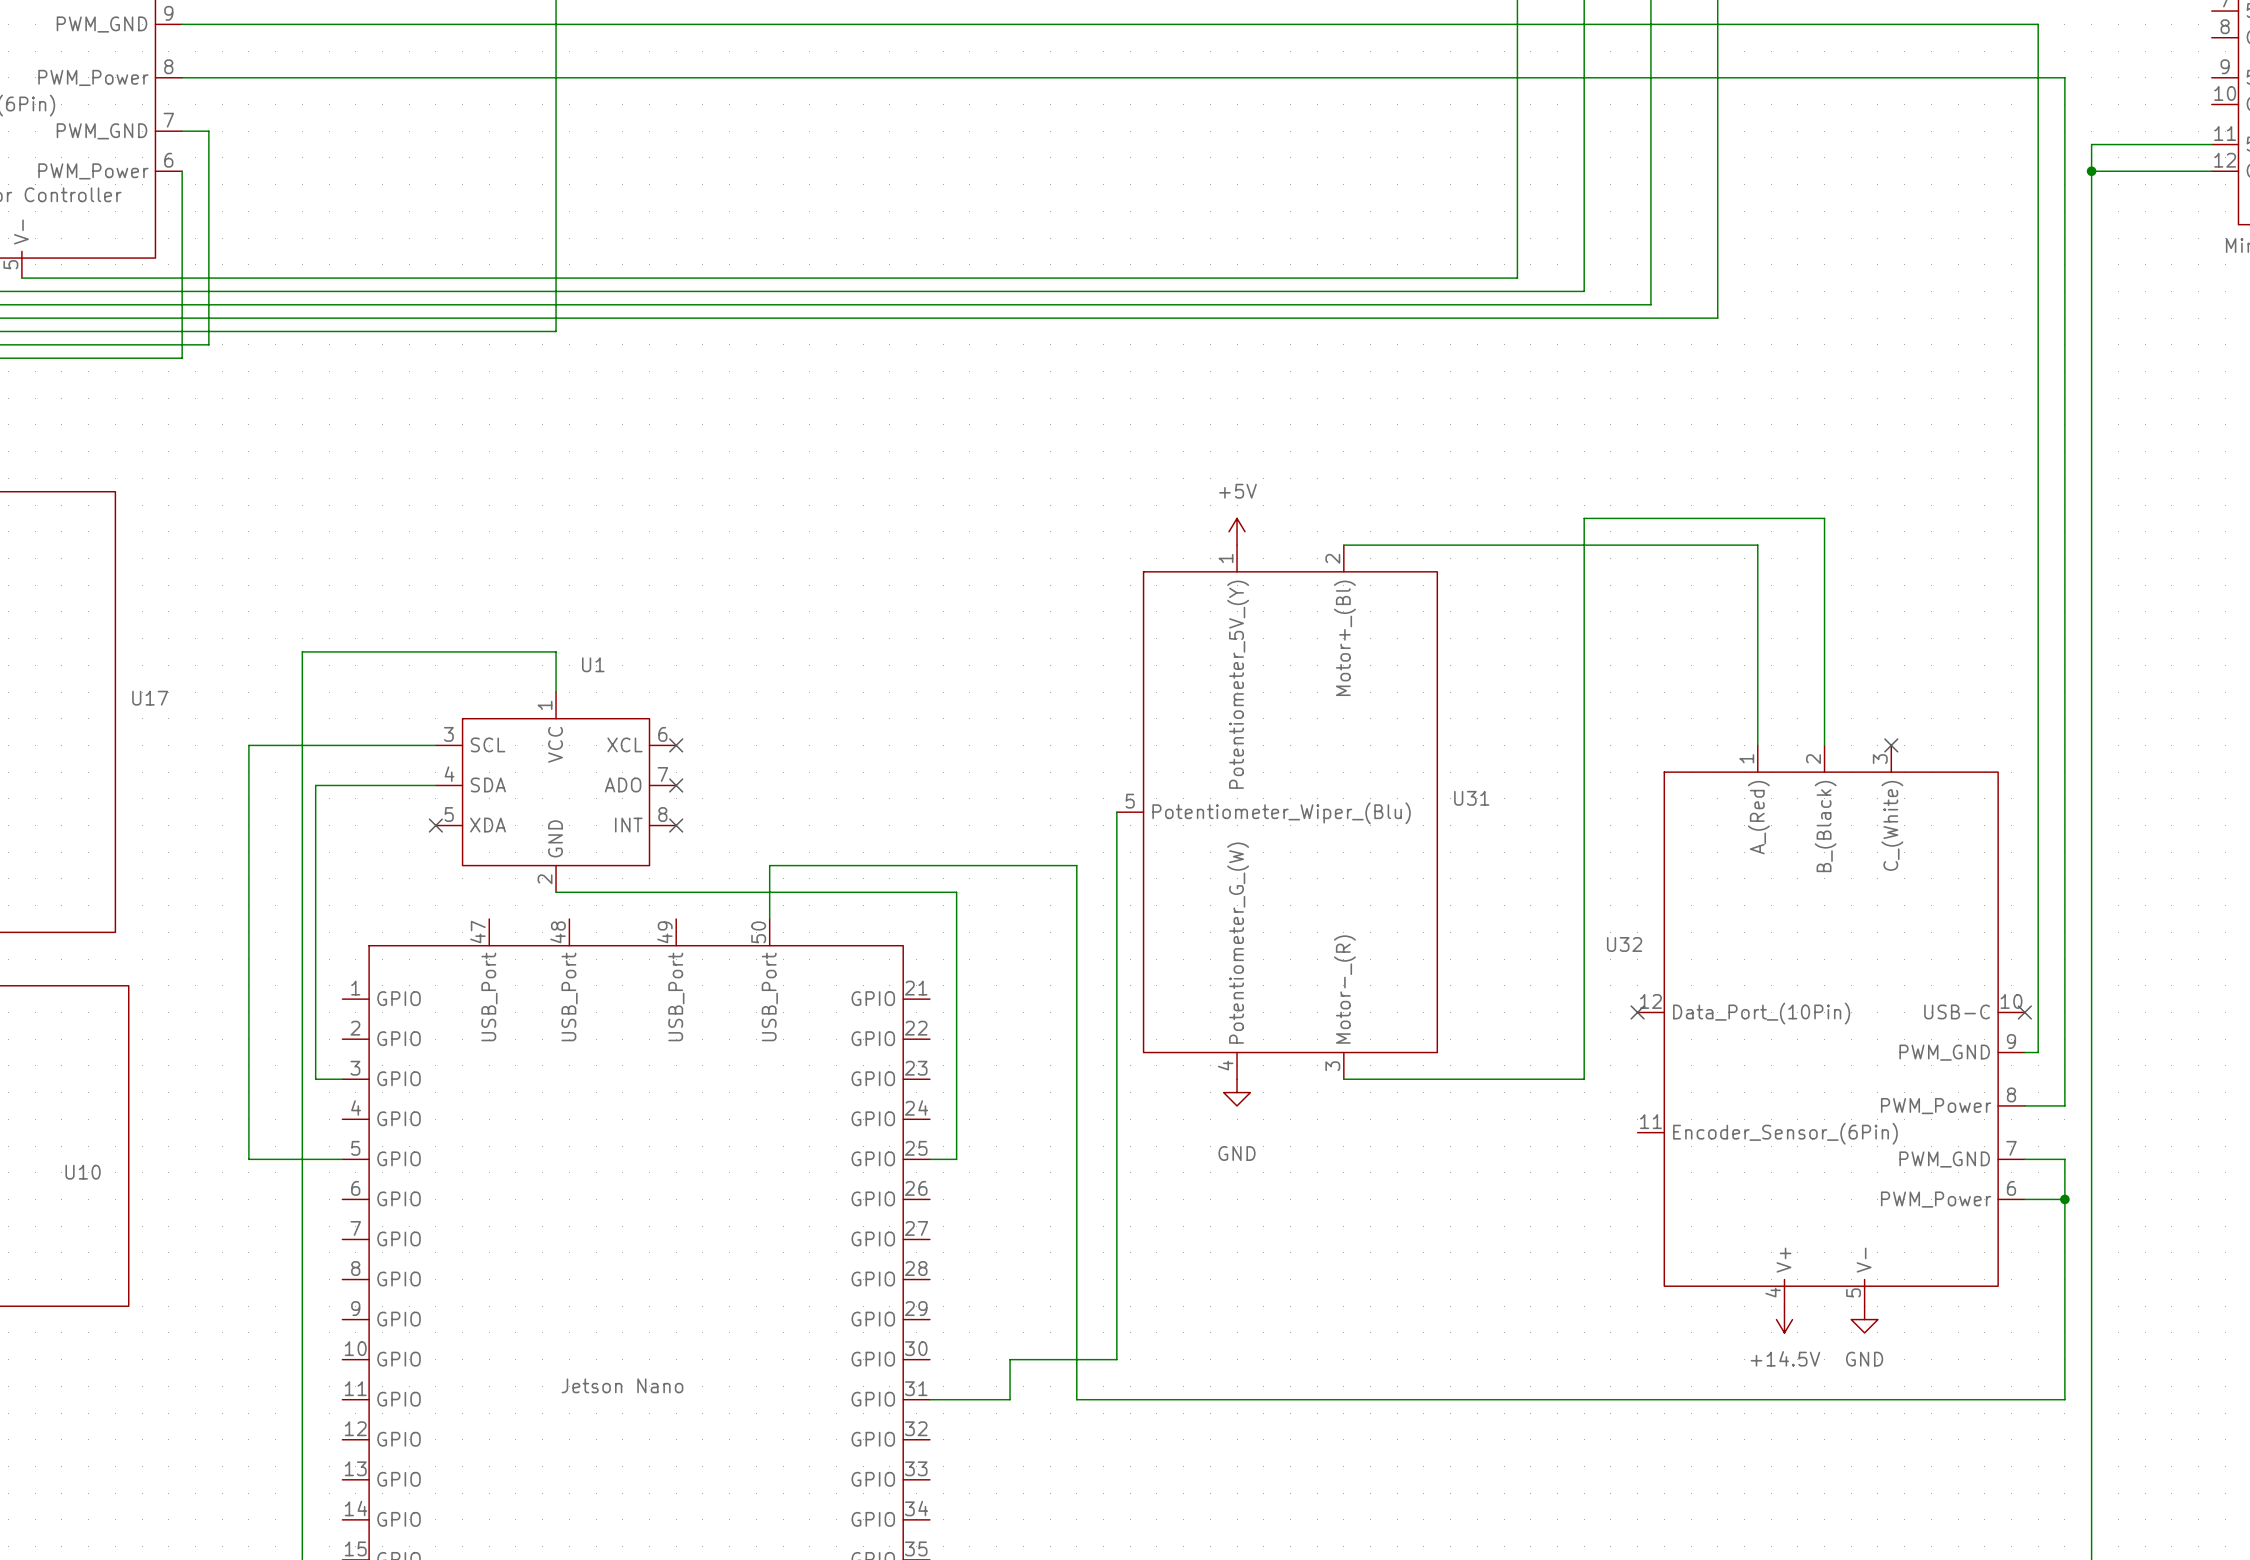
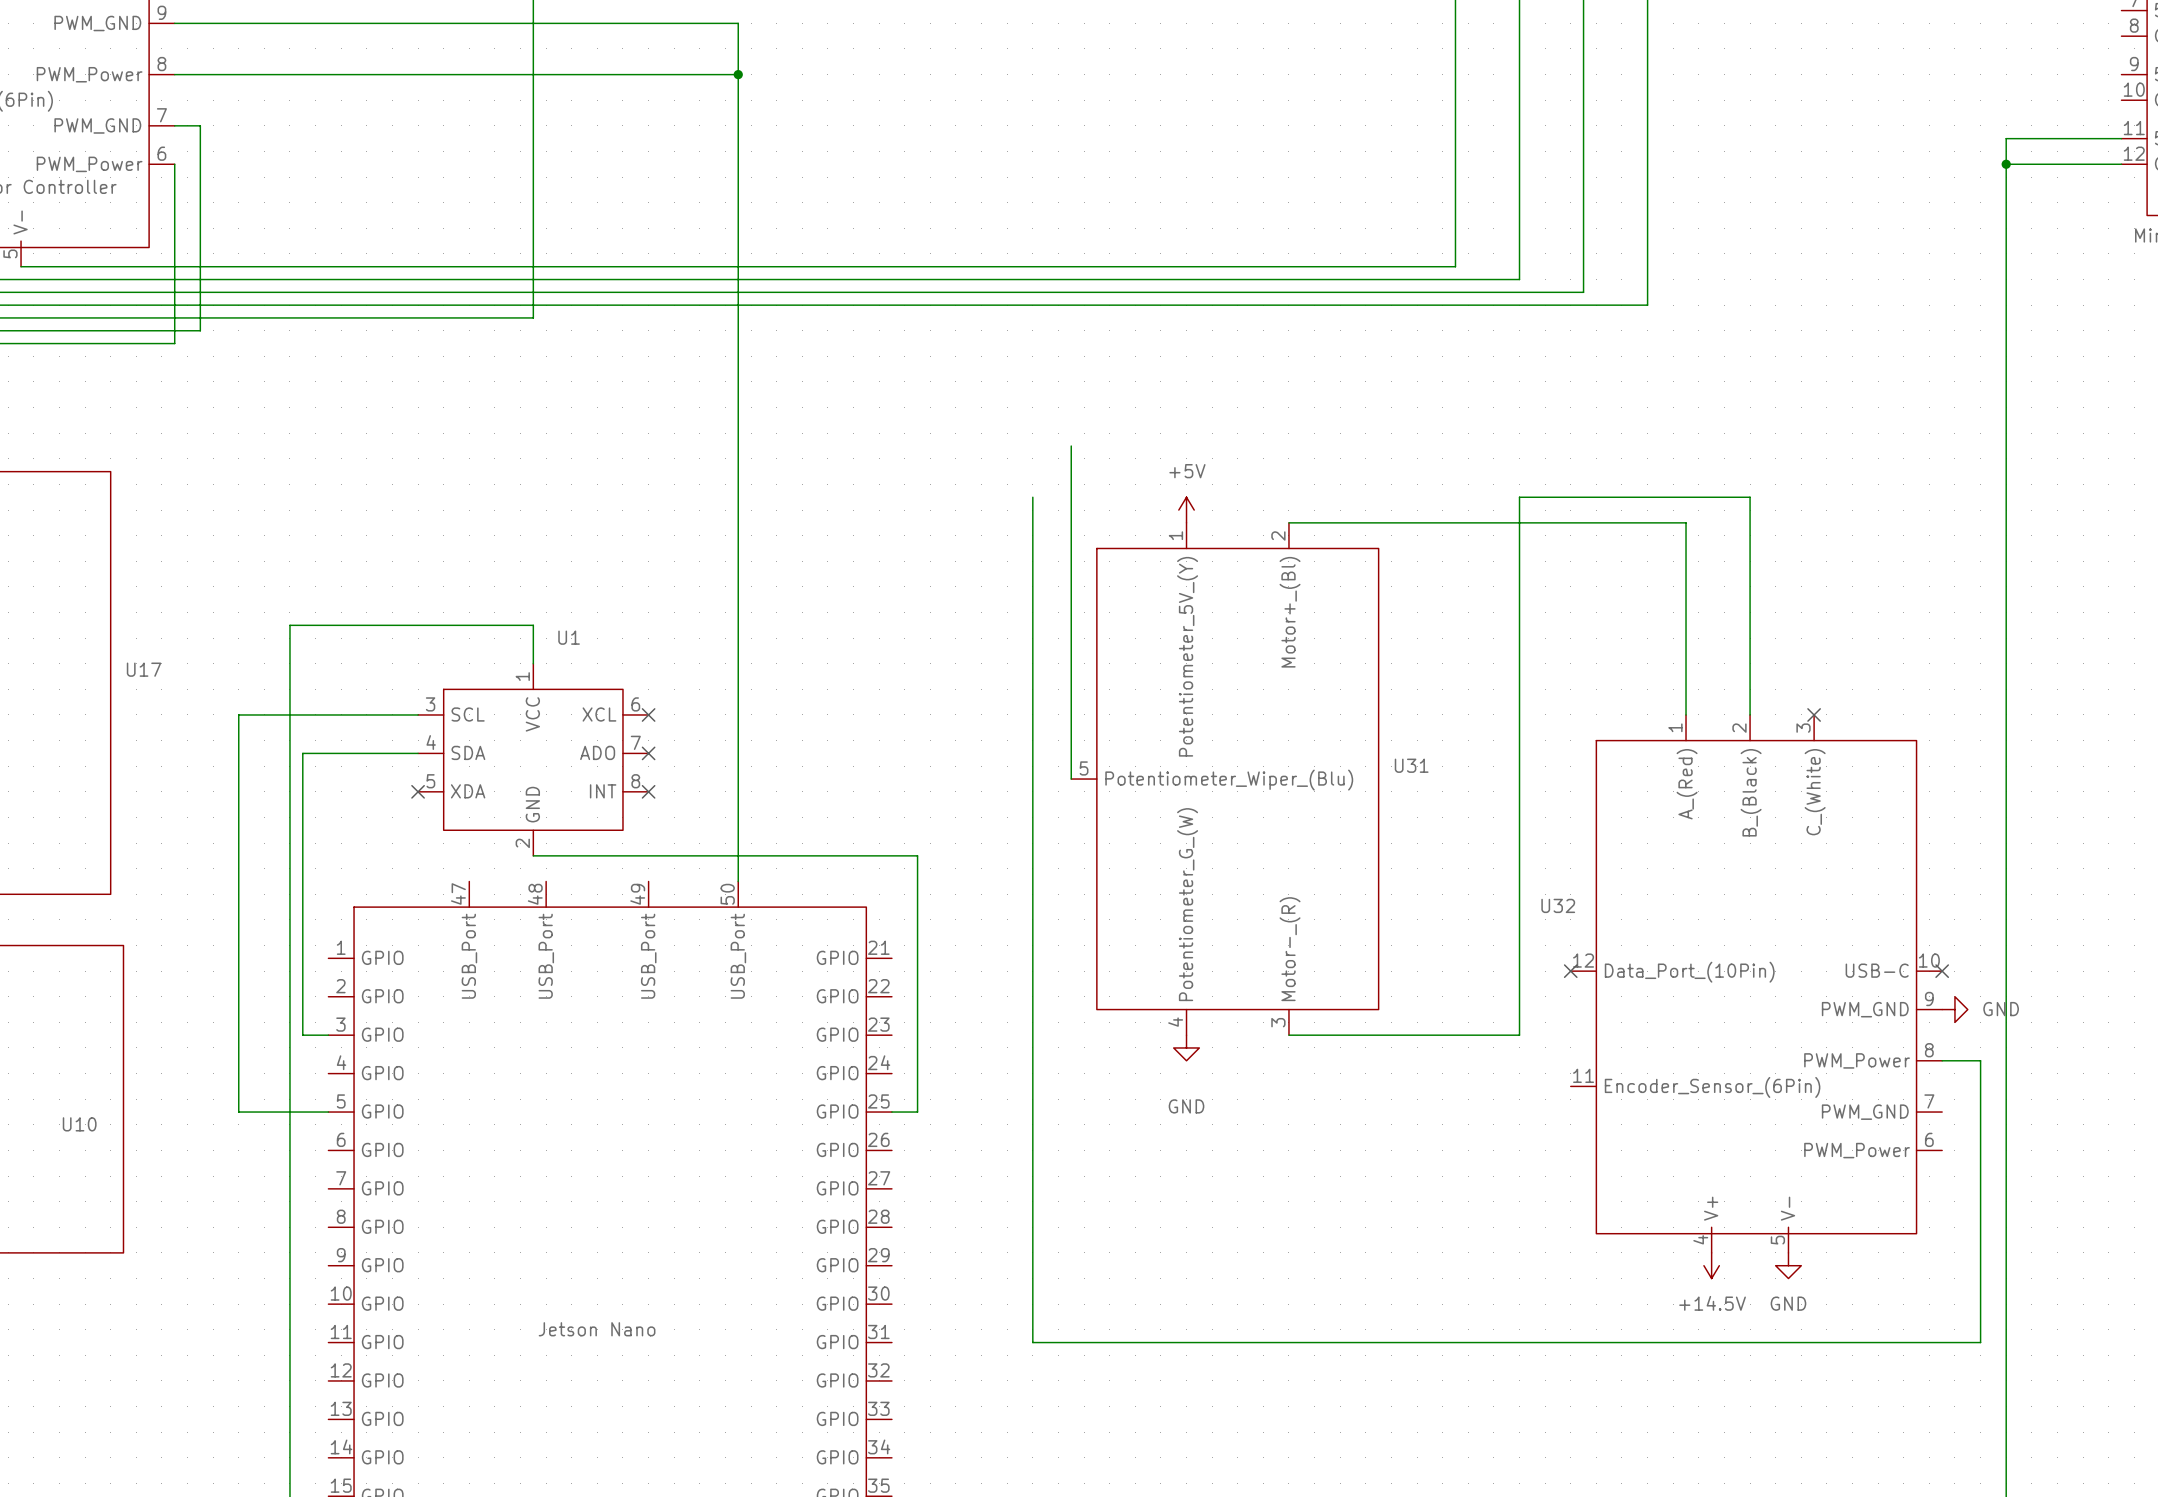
wire: (769, 24) (2038, 24) (2038, 1052) (2024, 1052) -> (738, 23) (738, 830)
wire: (769, 77) (2064, 77) (2064, 1105) -> none
junction: none -> (738, 74)
wire: (1116, 812) (1116, 1359) (1010, 1359) (1010, 1399) (929, 1399) -> (1071, 779) (1071, 446)
wire: (769, 865) (1076, 865) -> (1032, 497) (1032, 830)
power symbol: none -> GND (1954, 1009)
wire: (2024, 1159) (2064, 1159) -> (1980, 1060) (1980, 1112)
wire: (2024, 1199) (2064, 1199) -> none
junction: (2064, 1199) -> none

